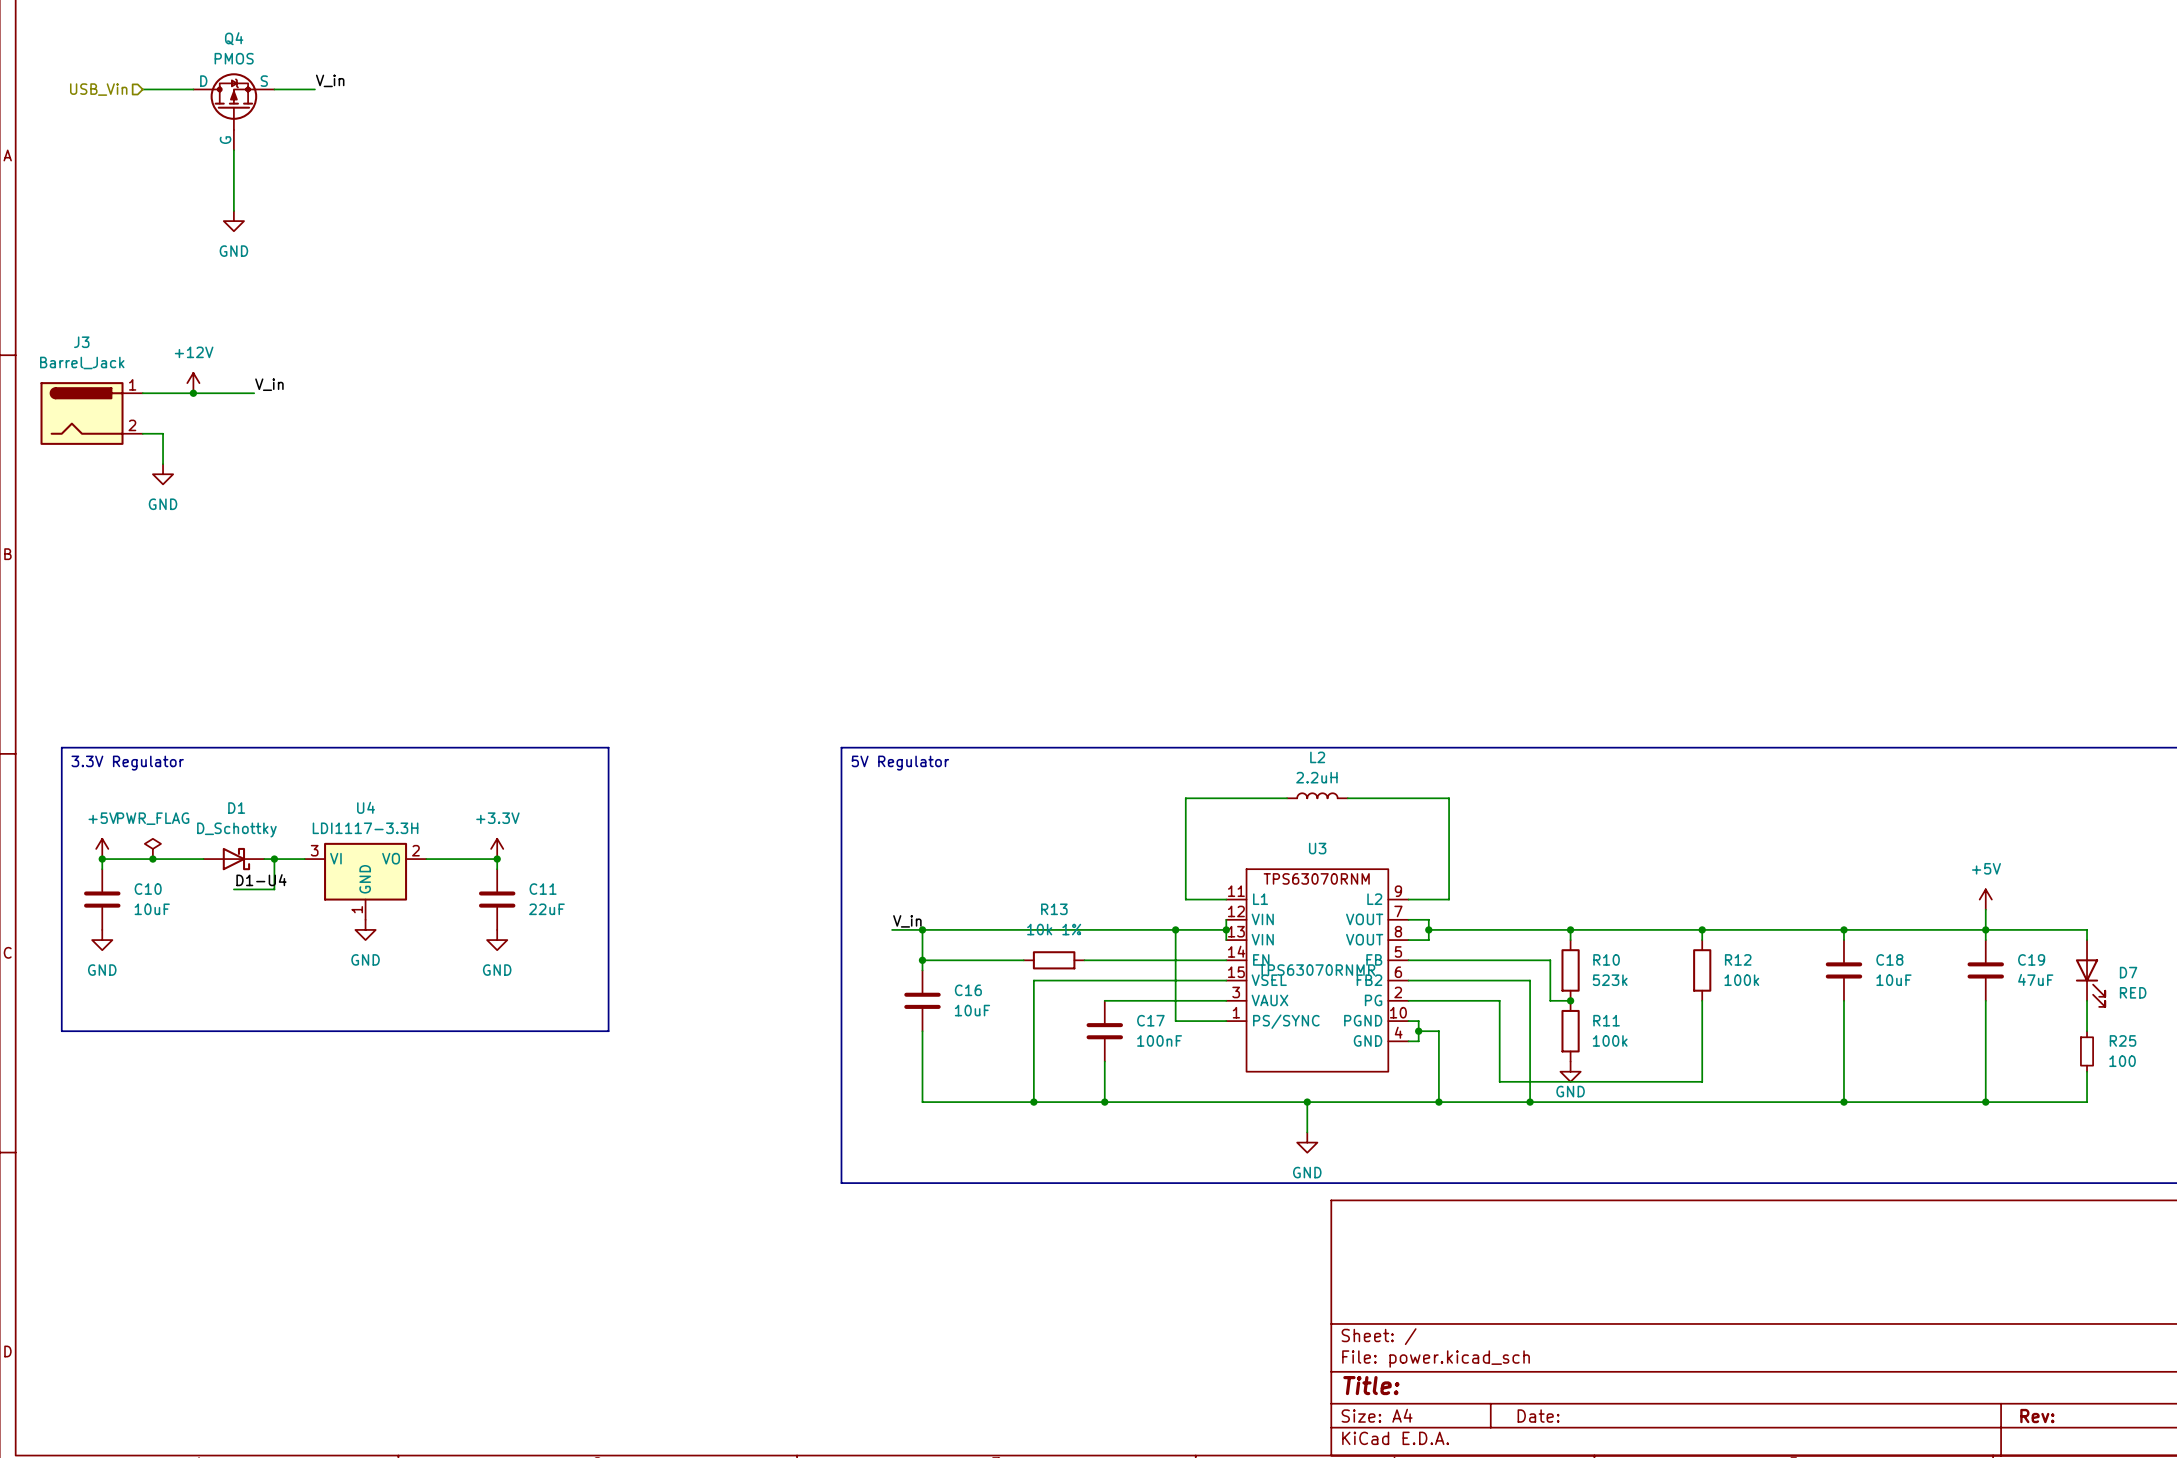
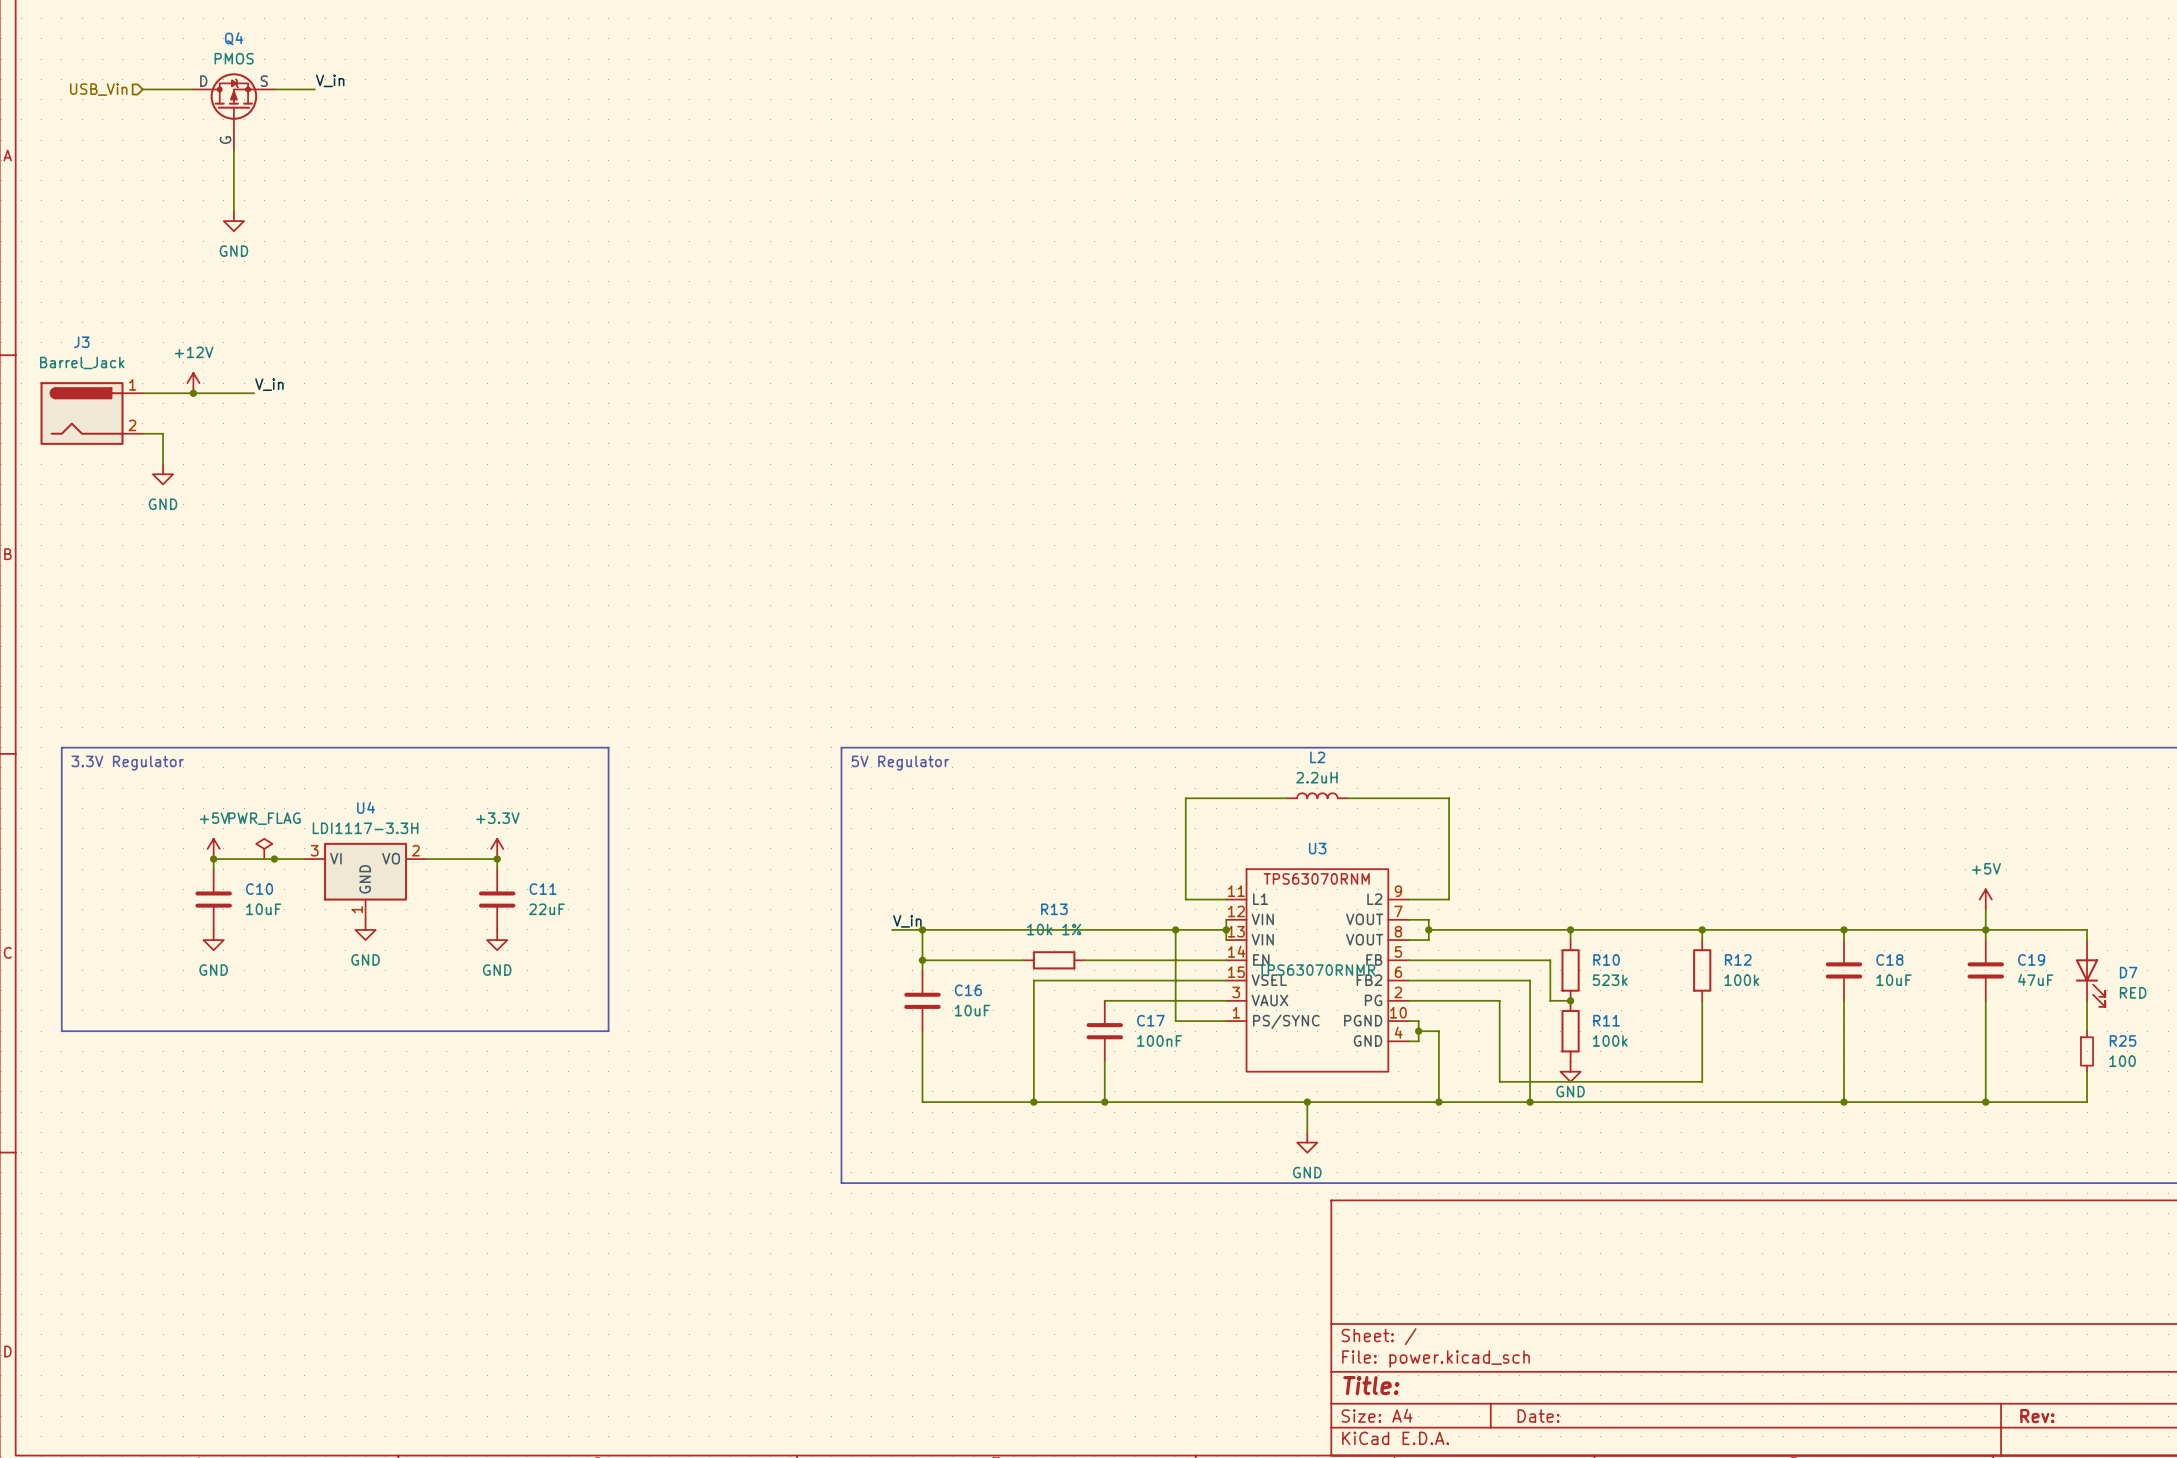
power symbol position: +5V (102, 848) -> +5V (213, 848)
power symbol position: PWR_FLAG (152, 848) -> PWR_FLAG (264, 848)
junction: (102, 859) -> none
junction: (152, 859) -> none
wire: (203, 859) (102, 859) (102, 869) -> none
junction: none -> (213, 859)
D1: D_Schottky (233, 859) -> none
wire: (274, 859) (274, 889) (233, 889) -> none
label: D1-U4 (261, 880) -> none
C10 position: (102, 899) -> (213, 899)
power symbol position: GND (102, 940) -> GND (213, 940)

